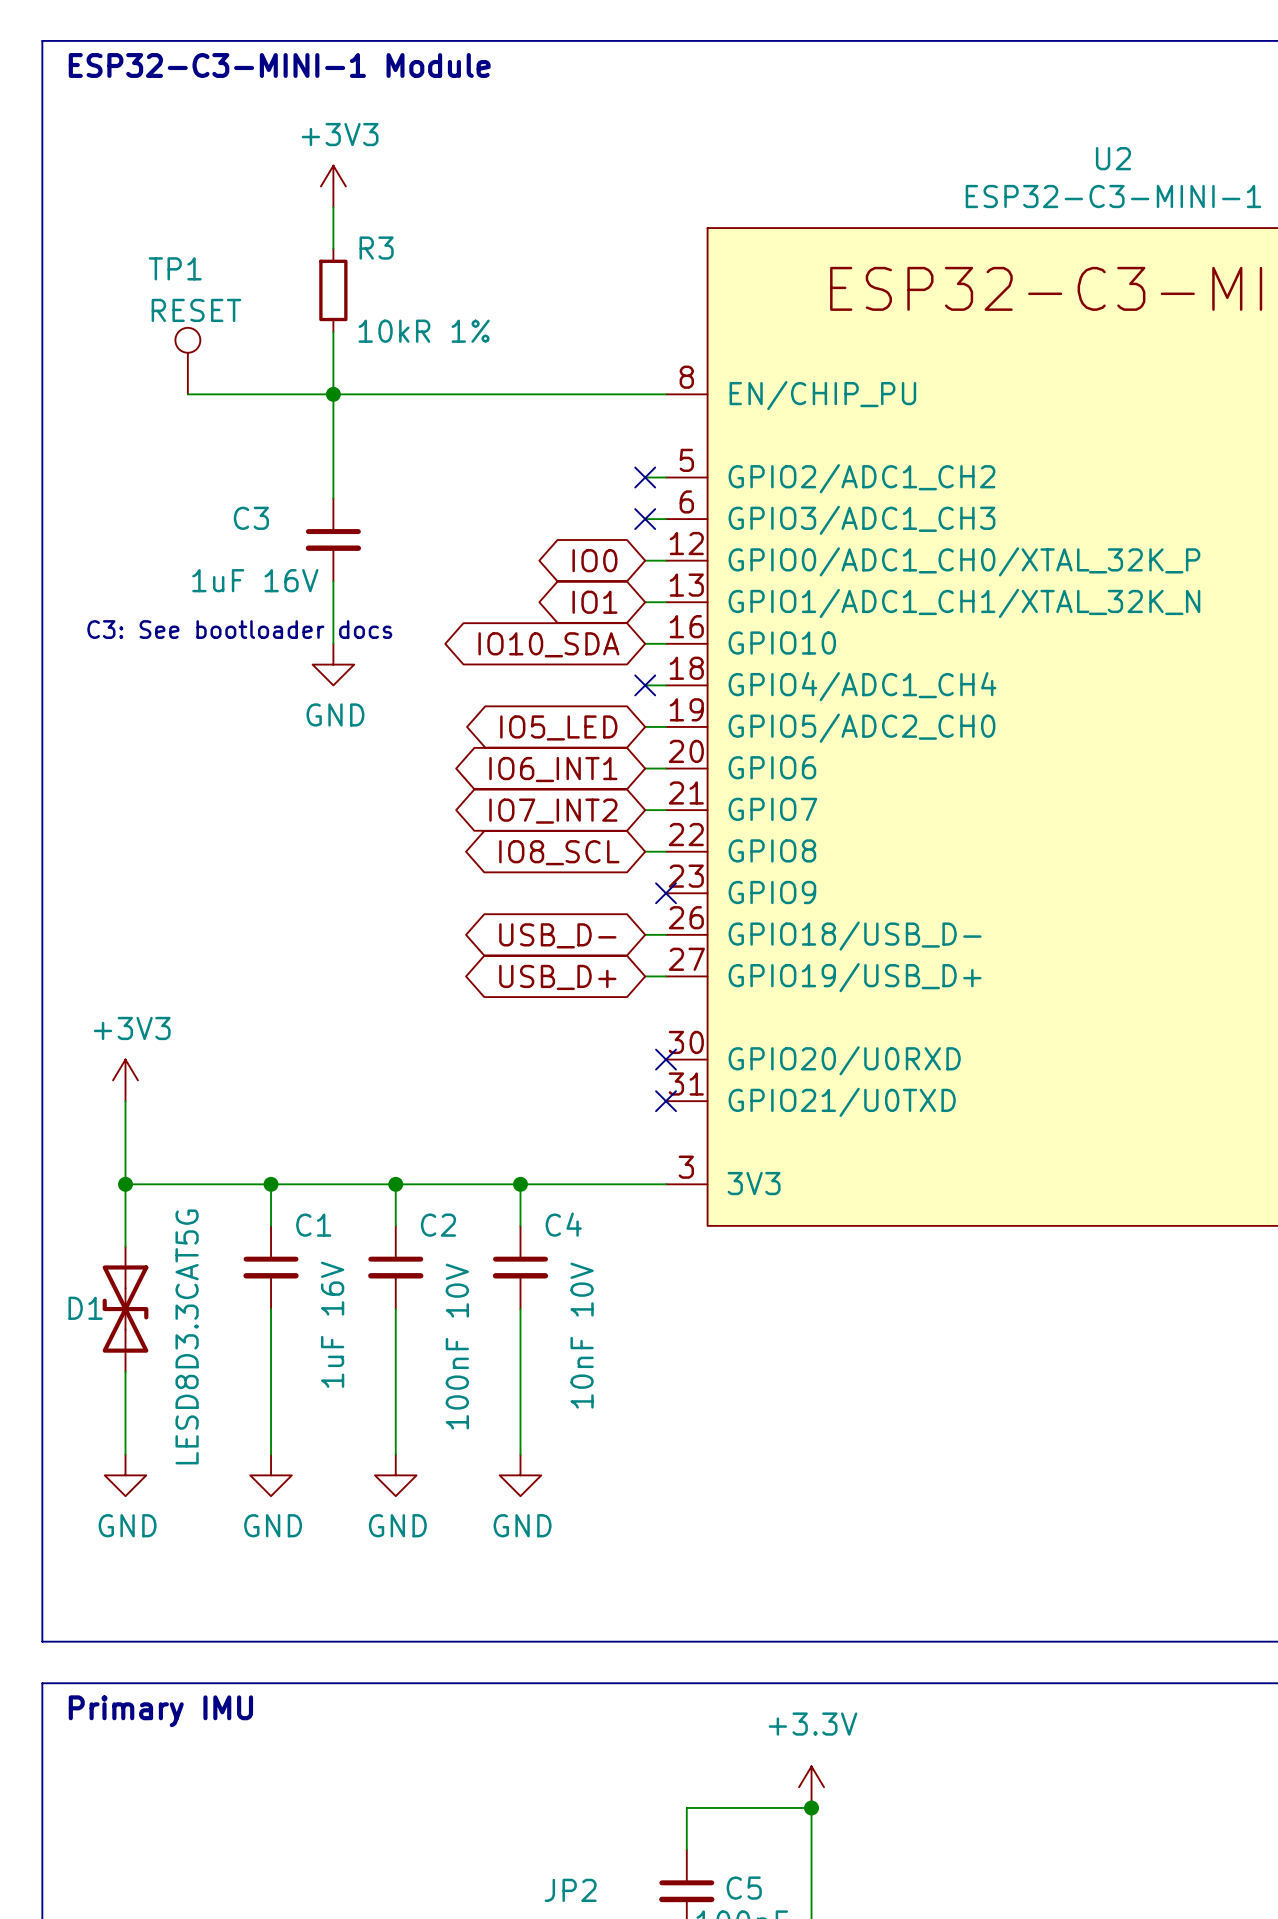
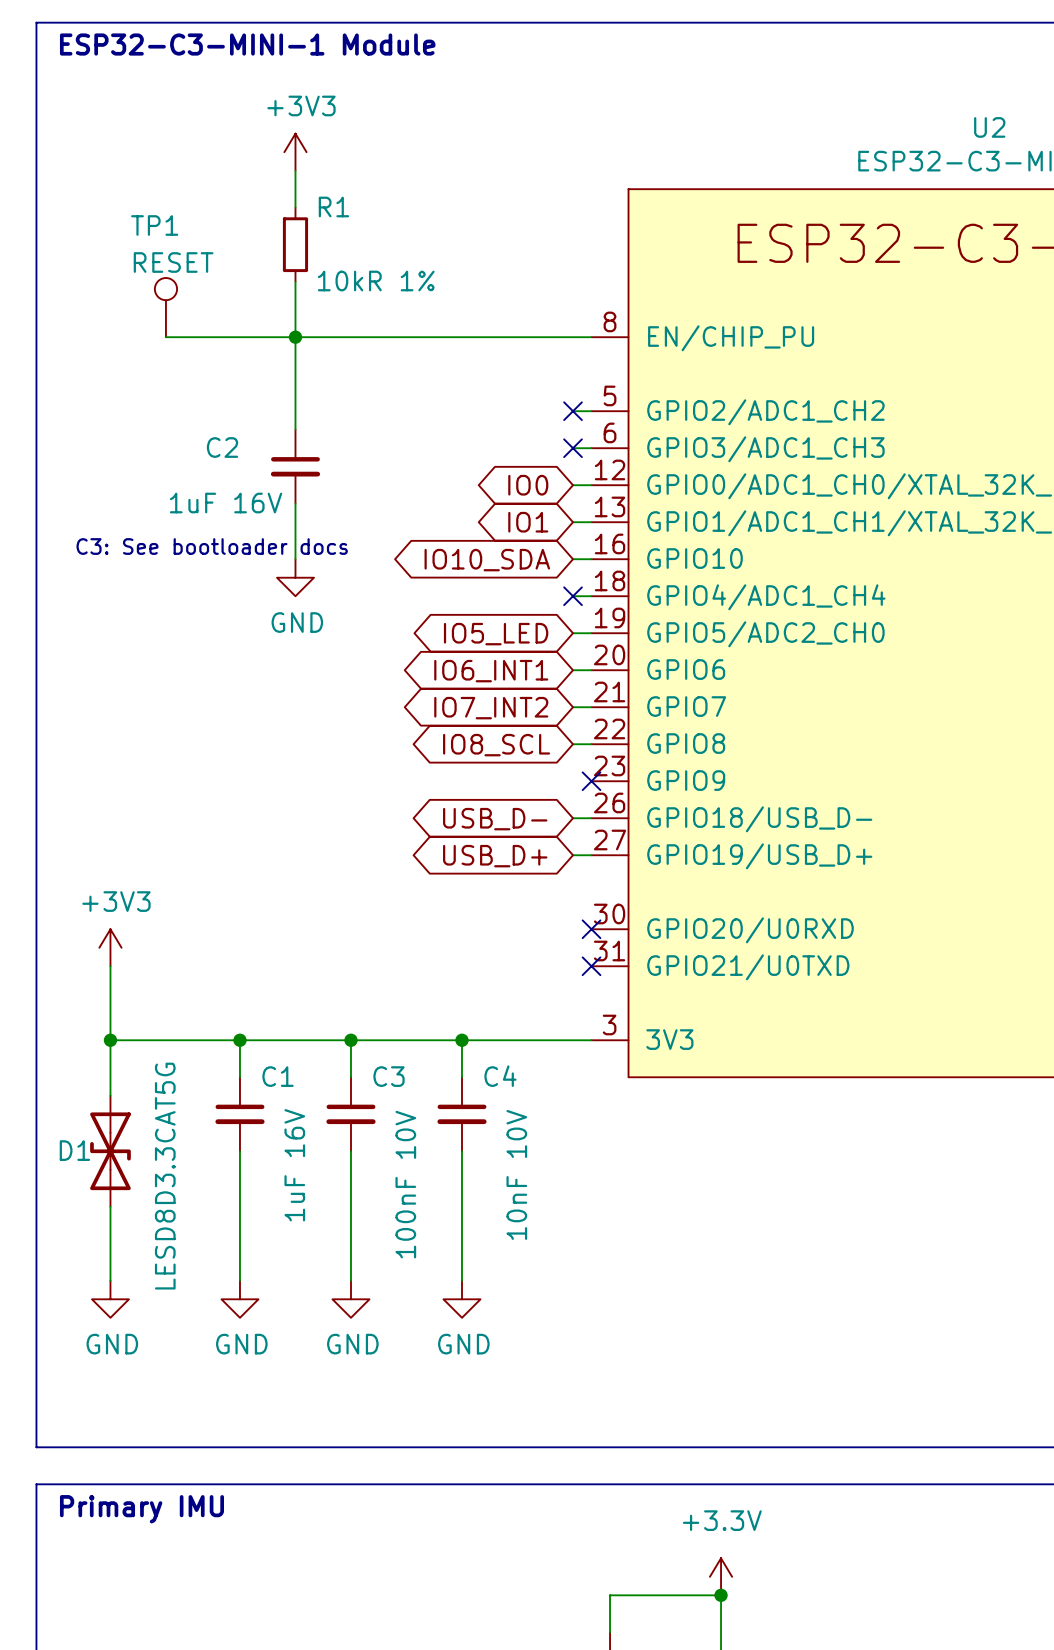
R3 name: R3 (376, 248) -> R1 (333, 206)
C3 name: C3 (251, 518) -> C2 (222, 447)
C2 name: C2 (438, 1225) -> C3 (389, 1076)

